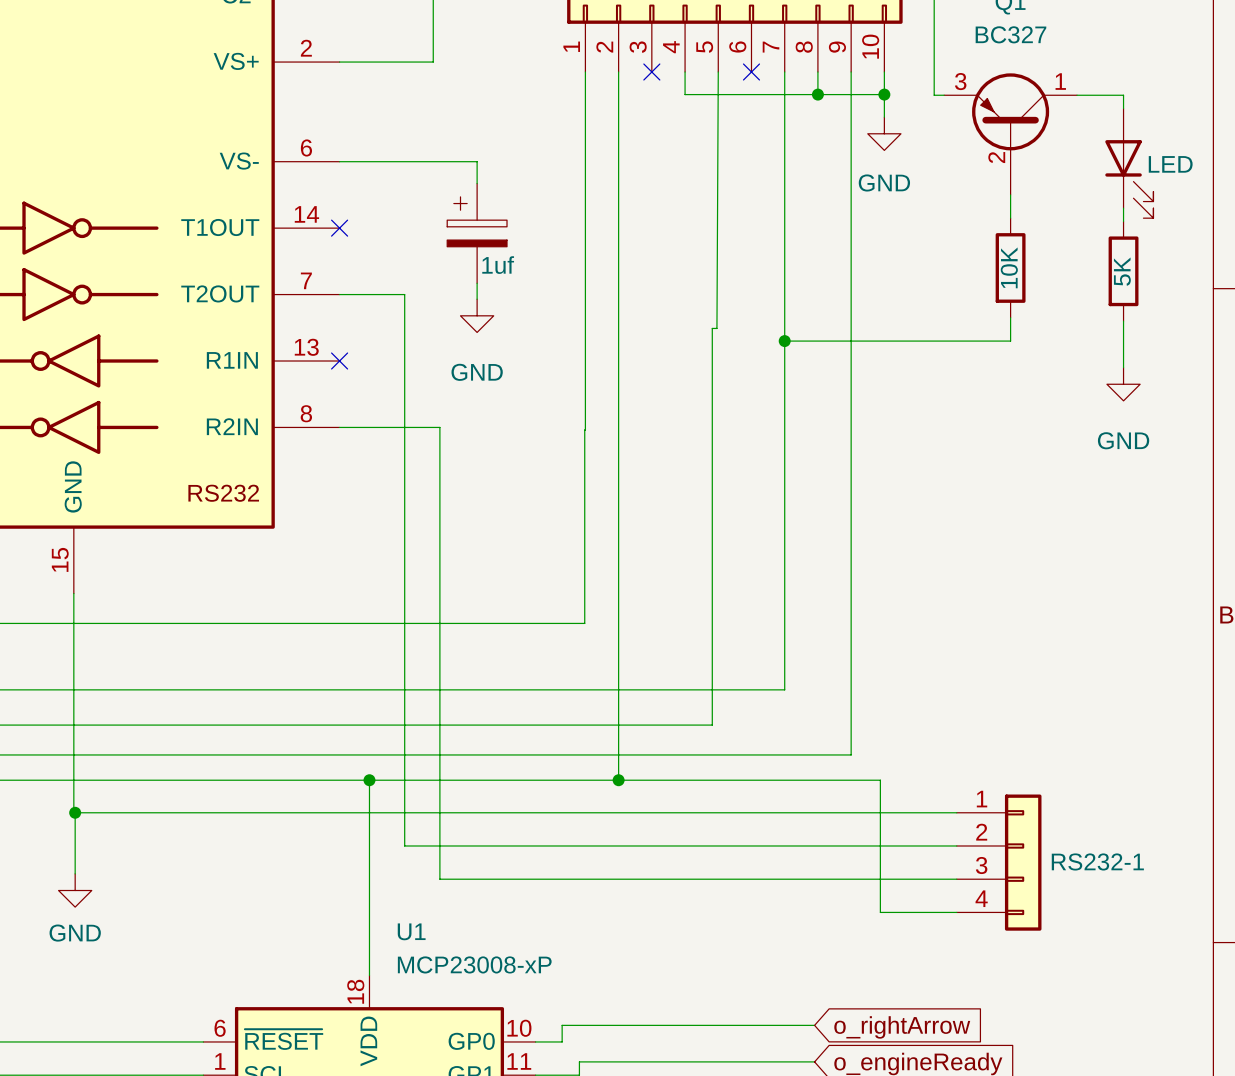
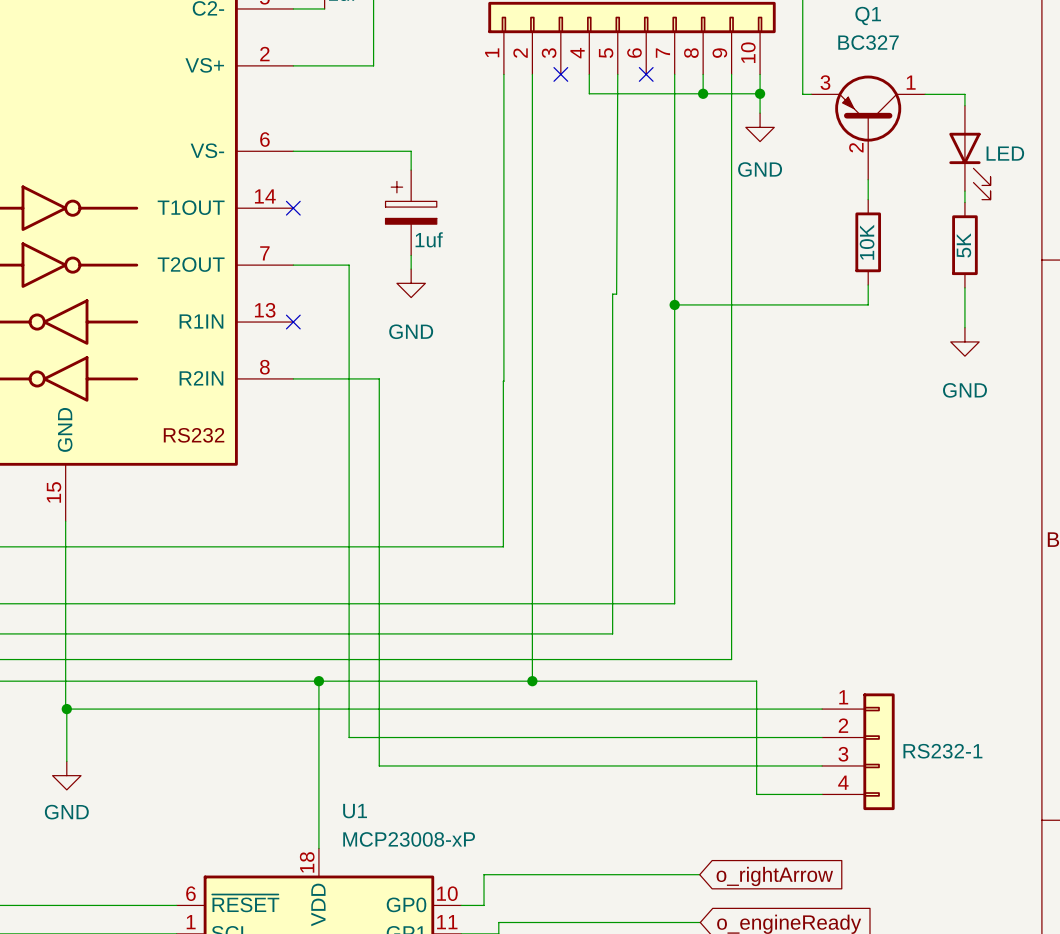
wire: (562, 1025) (814, 1025) -> (484, 891) (484, 874) (699, 874)
global label position: o_rightArrow (902, 1027) -> o_rightArrow (774, 876)

